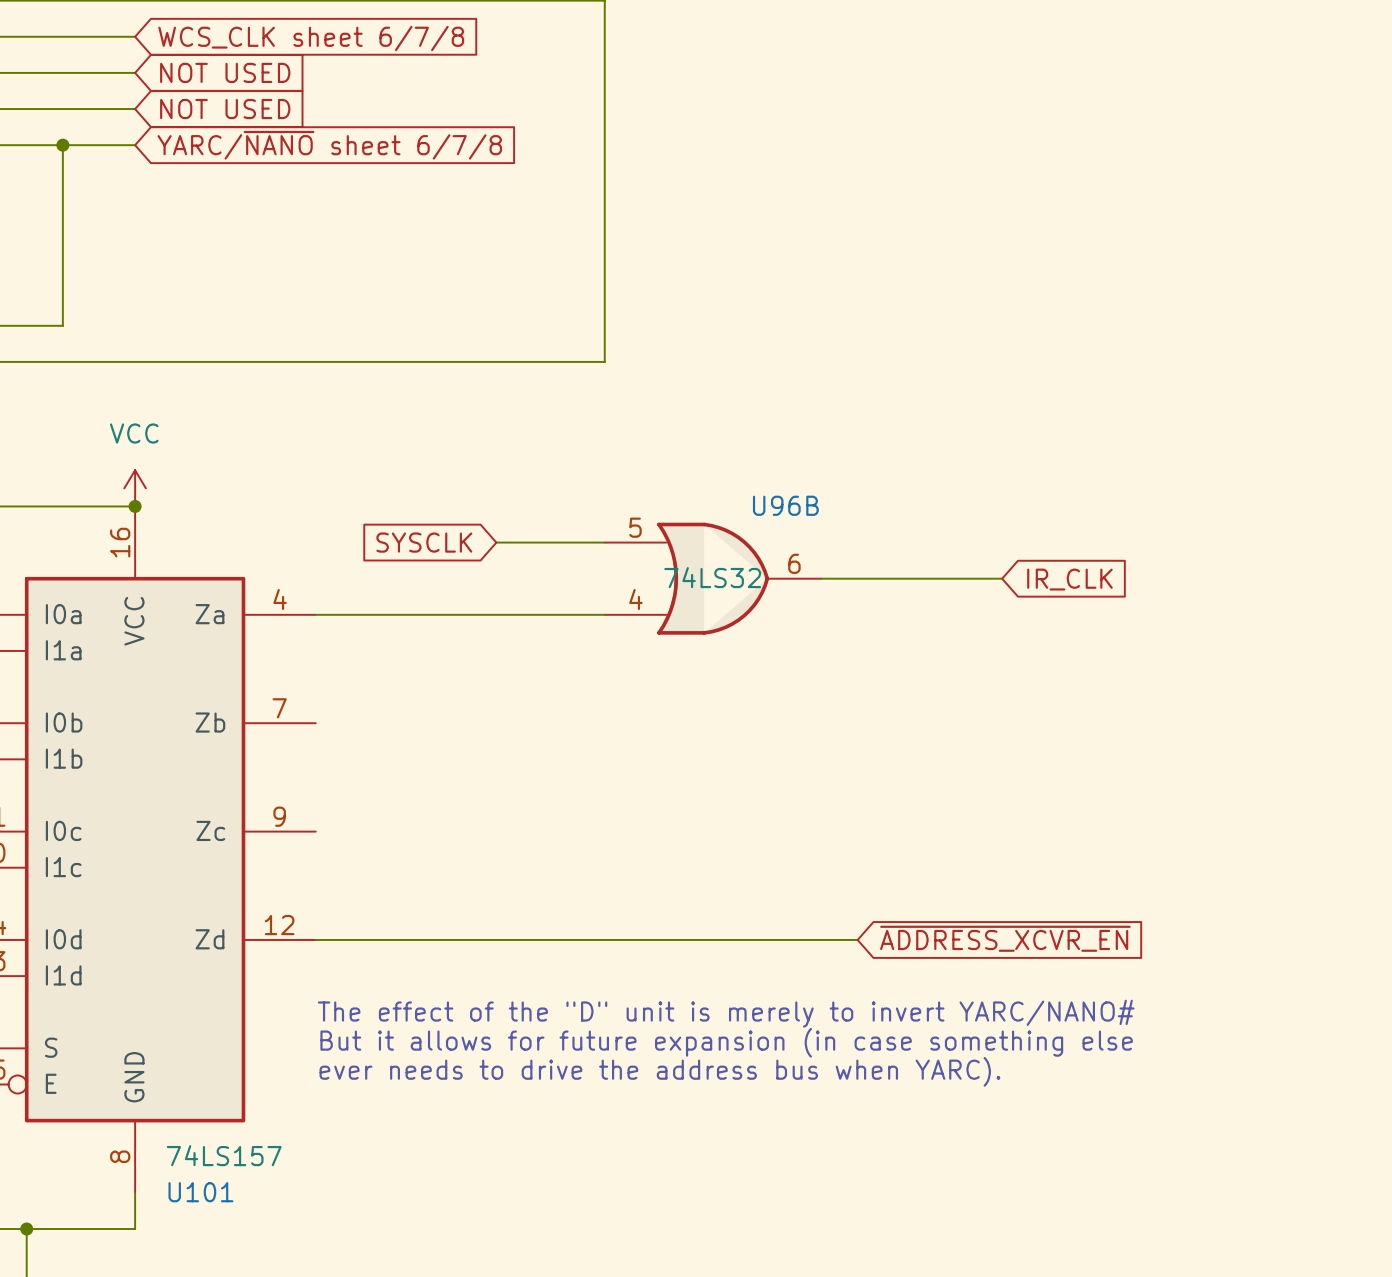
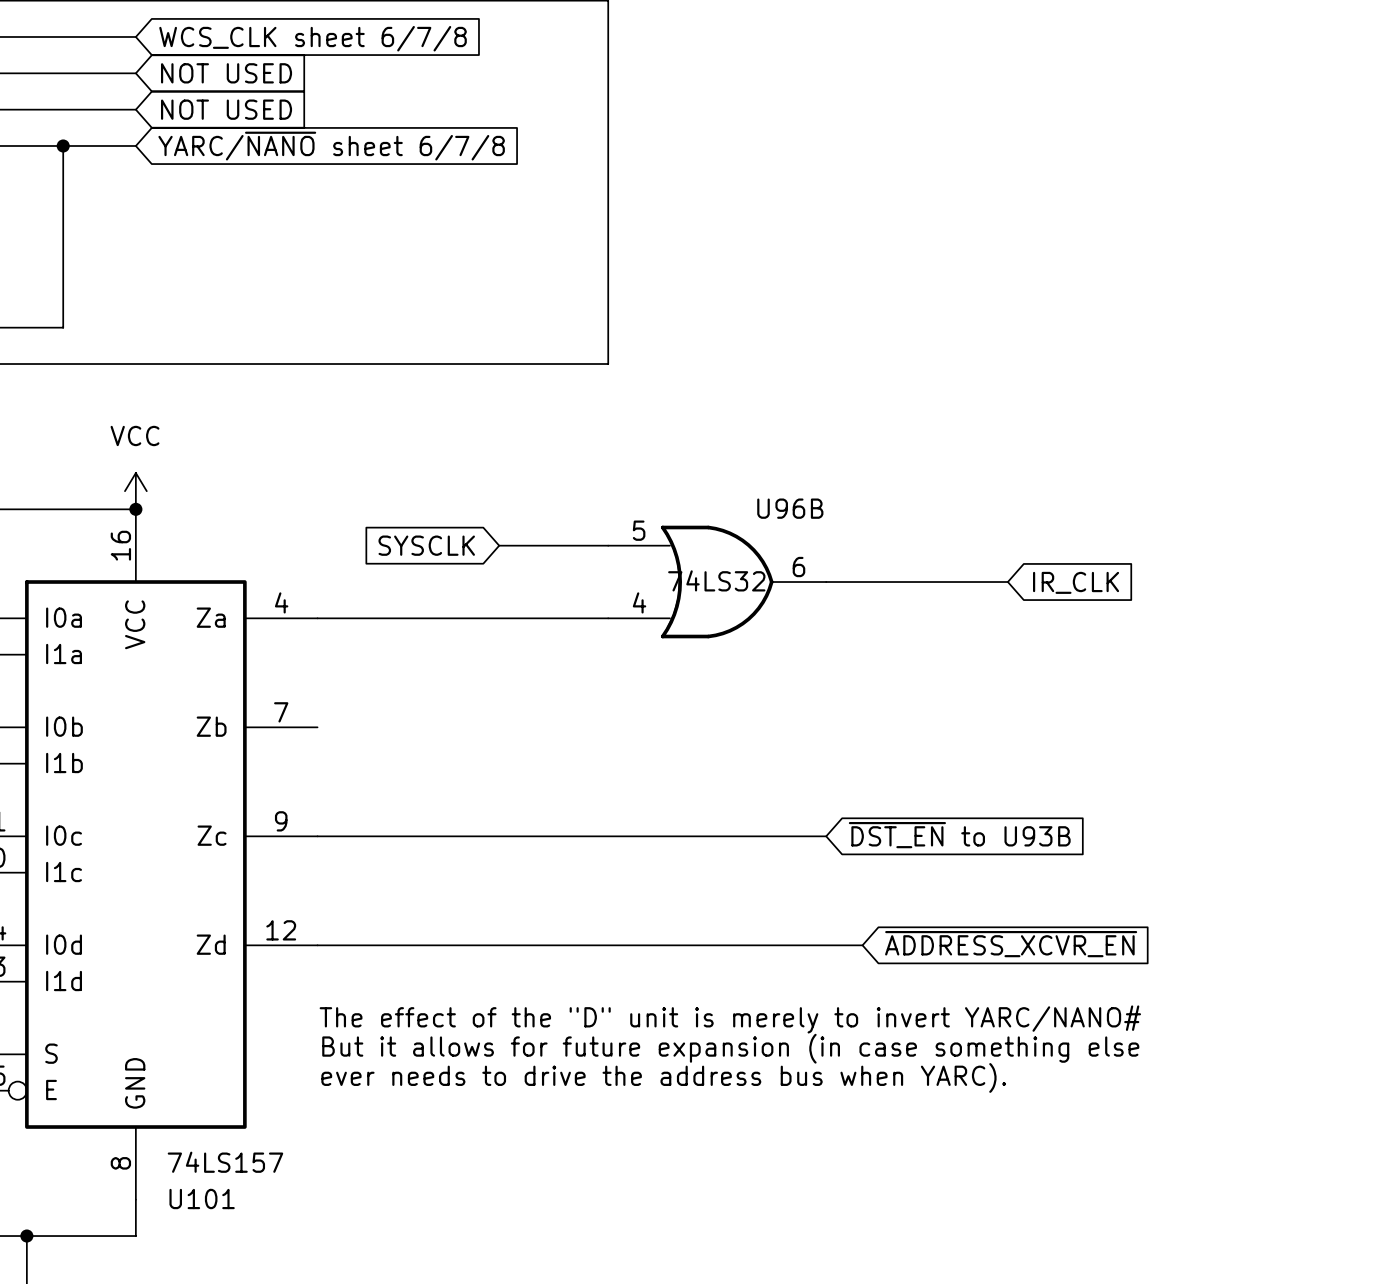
global label: none -> ~{DST_EN} to U93B (959, 835)
wire: none -> (317, 836) (826, 836)

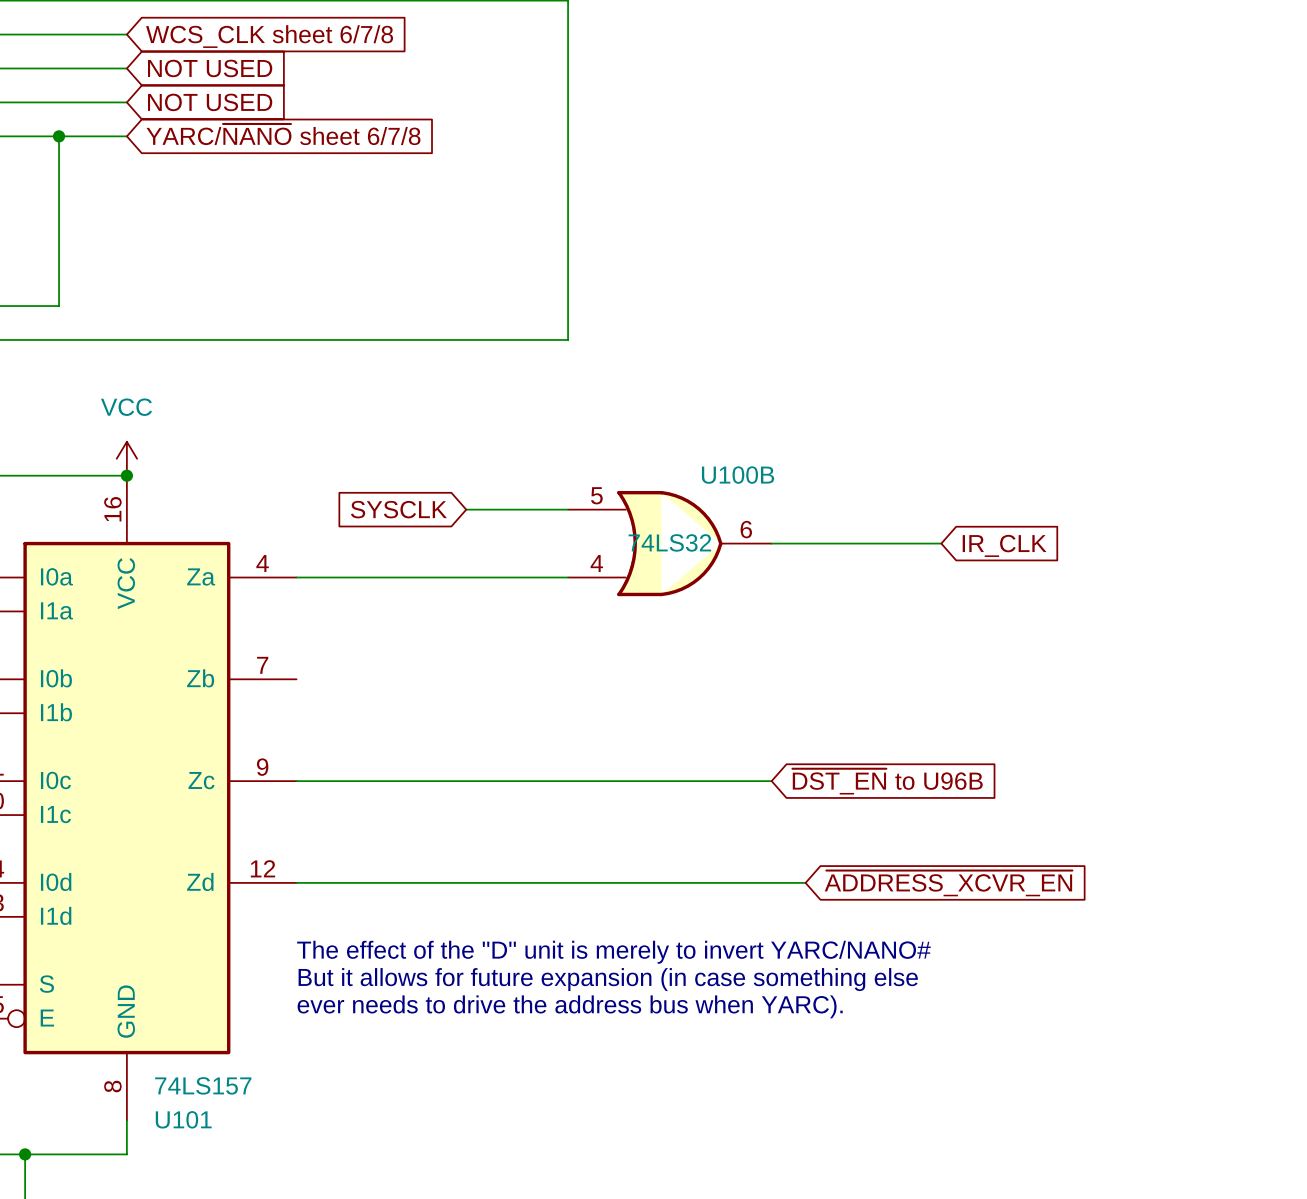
U96B name: U96B (790, 508) -> U100B (738, 475)
global label: ~{DST_EN} to U93B (959, 835) -> ~{DST_EN} to U96B (887, 781)

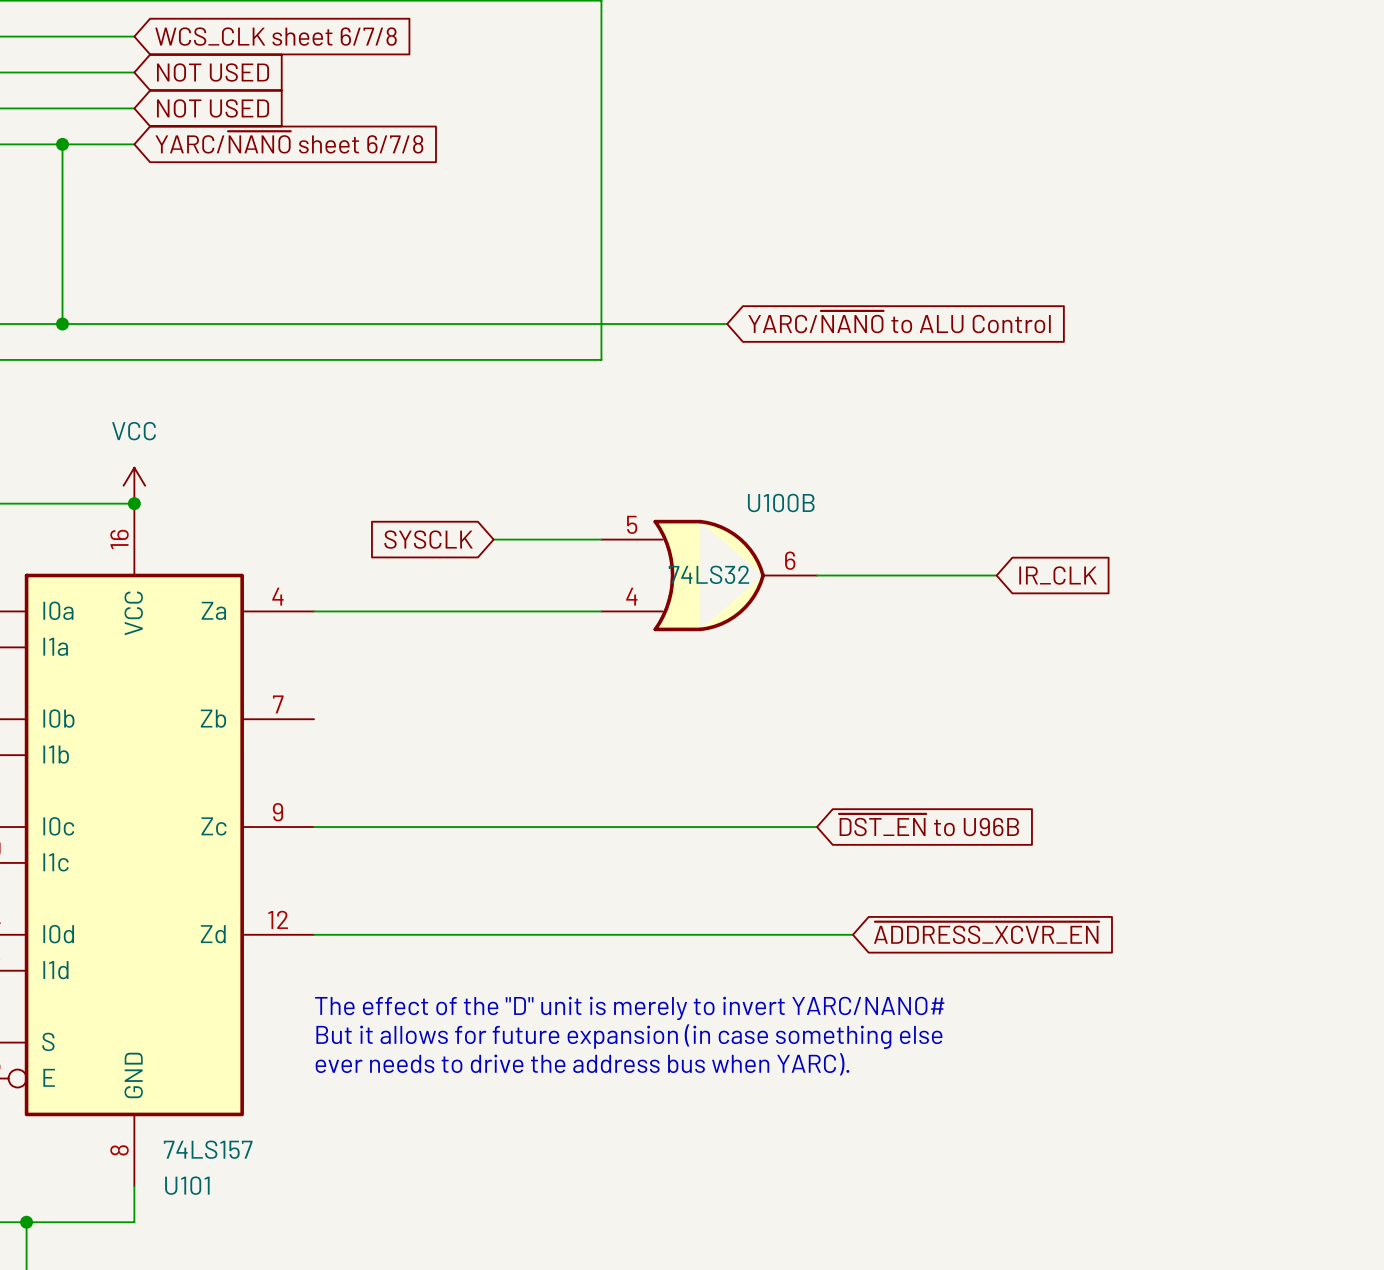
global label: none -> YARC/~{NANO} to ALU Control (899, 322)
wire: none -> (62, 324) (727, 324)
junction: none -> (62, 324)

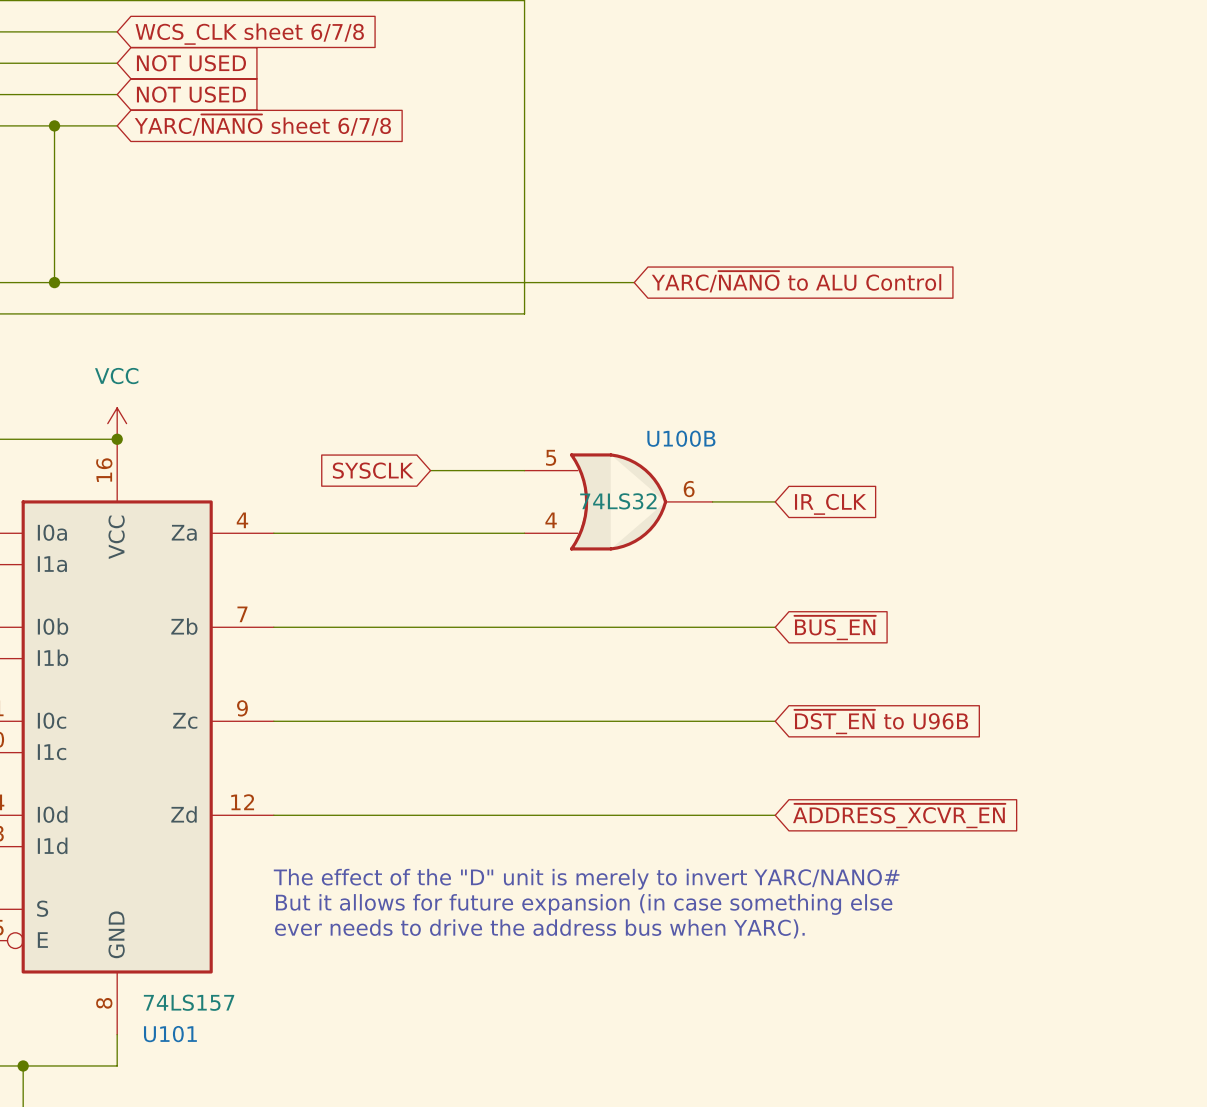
wire: (888, 575) (996, 575) -> none
global label position: IR_CLK (1058, 575) -> IR_CLK (830, 504)
global label: none -> ~{BUS_EN} (835, 628)
wire: none -> (273, 627) (775, 627)
global label position: ~{DST_EN} to U96B (929, 825) -> ~{DST_EN} to U96B (881, 722)
wire: none -> (712, 721) (775, 721)
global label position: ~{ADDRESS_XCVR_EN} (986, 932) -> ~{ADDRESS_XCVR_EN} (899, 816)
wire: none -> (743, 815) (775, 815)

